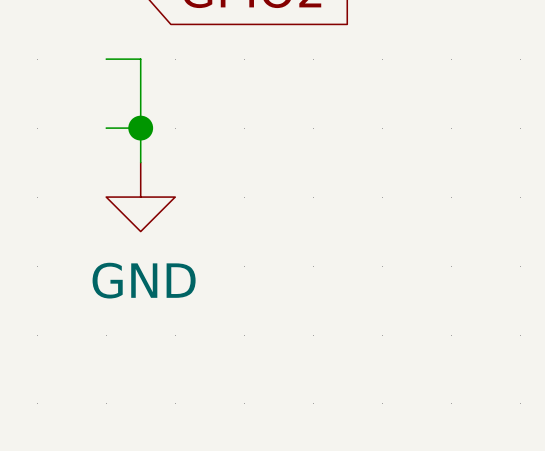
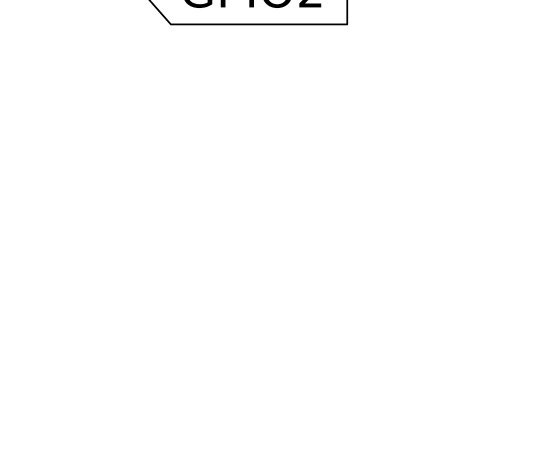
wire: (106, 59) (140, 59) (140, 162) -> none
wire: (106, 128) (140, 128) -> none
junction: (140, 128) -> none
power symbol: GND (140, 197) -> none

